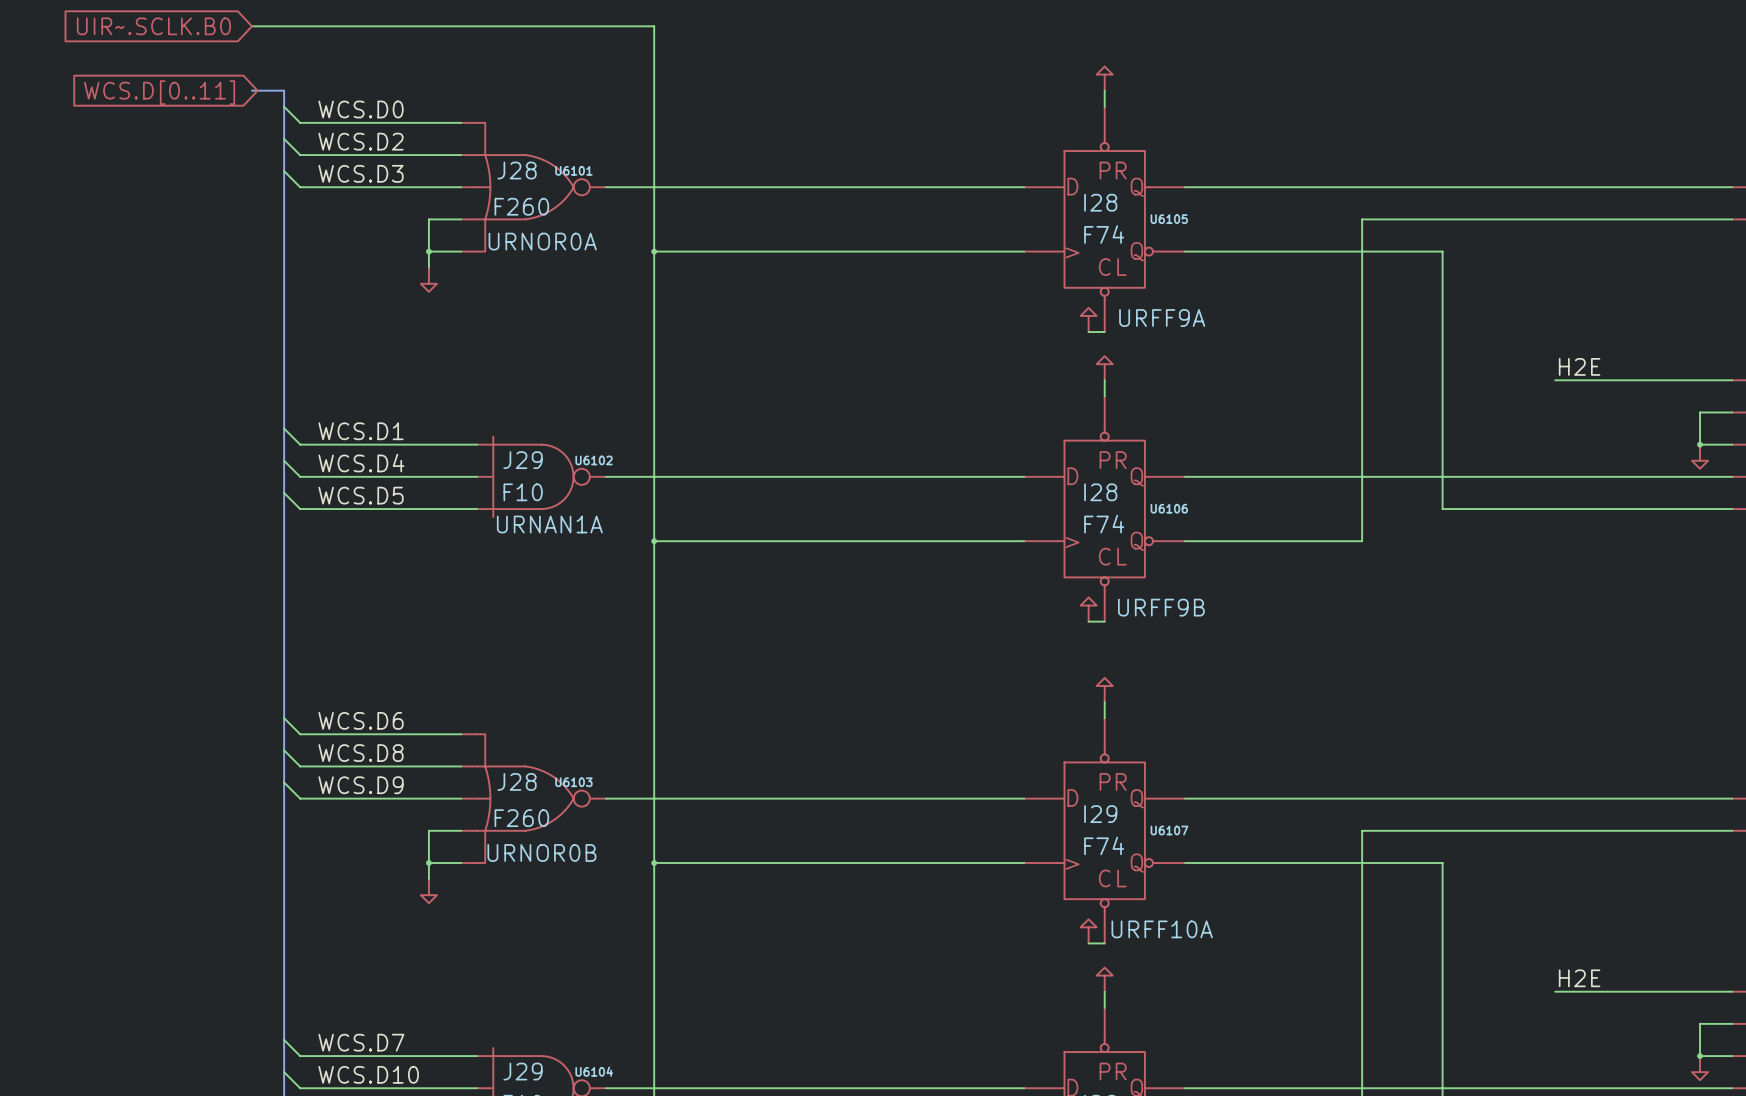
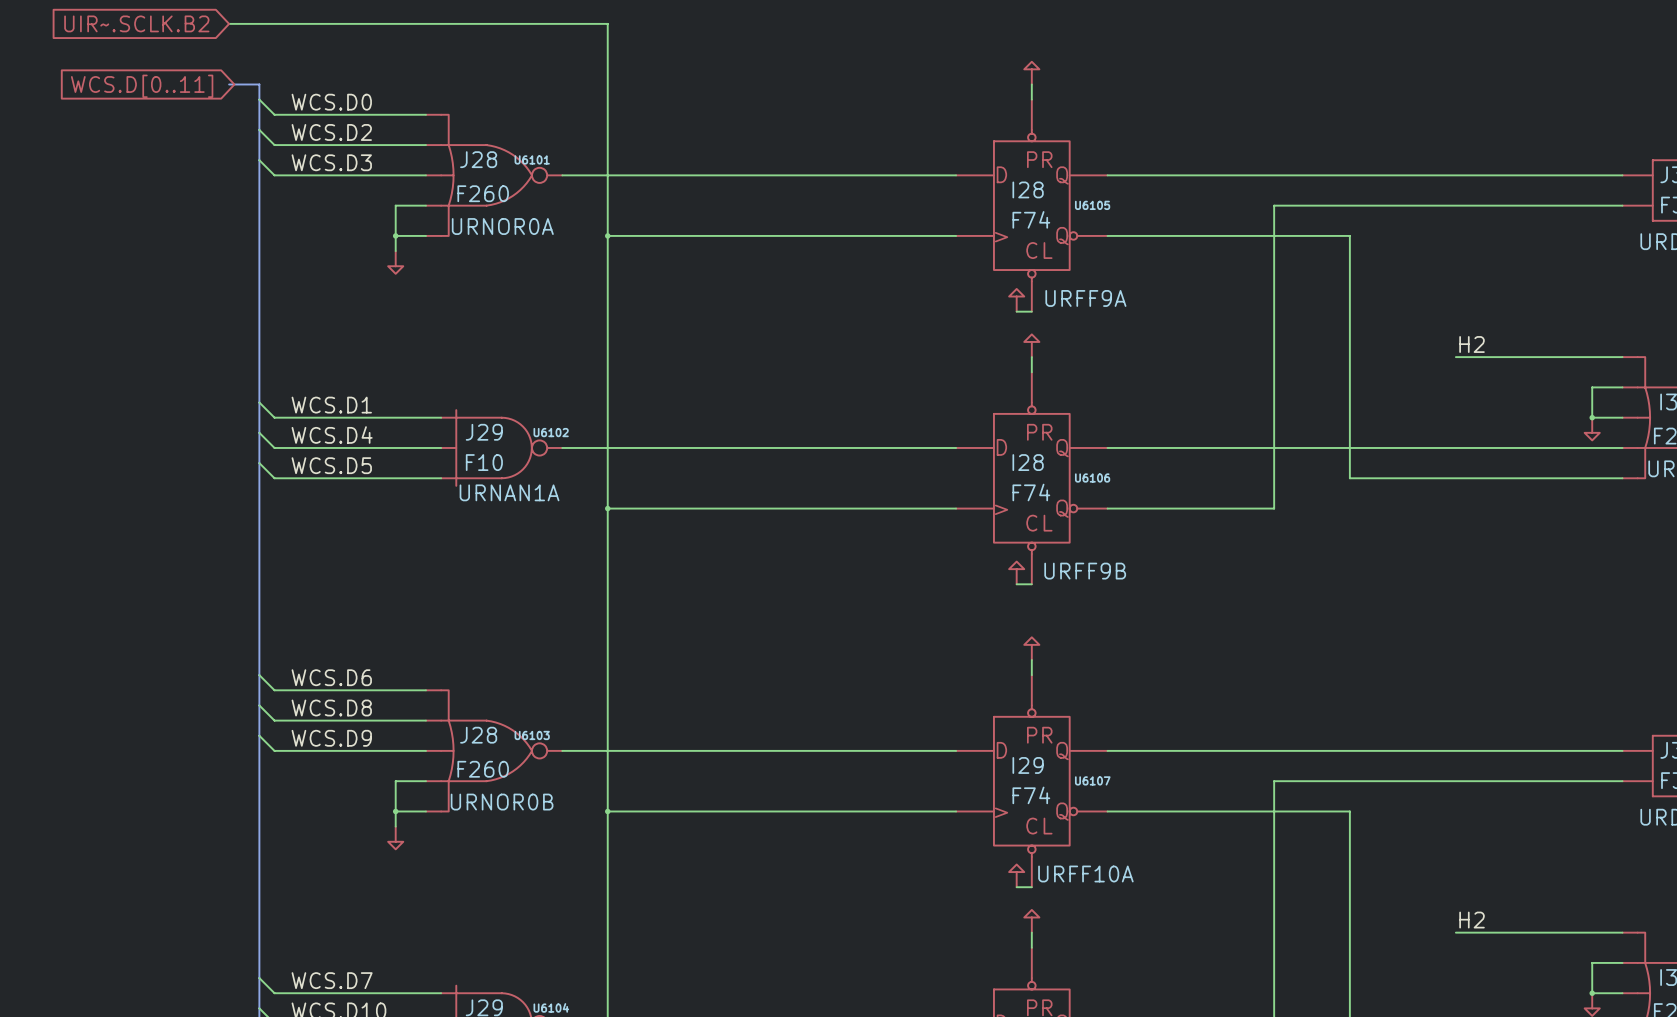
global label: UIR~.SCLK.B0 (153, 26) -> UIR~.SCLK.B2 (136, 23)
label: H2E (1579, 366) -> H2 (1472, 344)
label: H2E (1579, 978) -> H2 (1472, 920)

